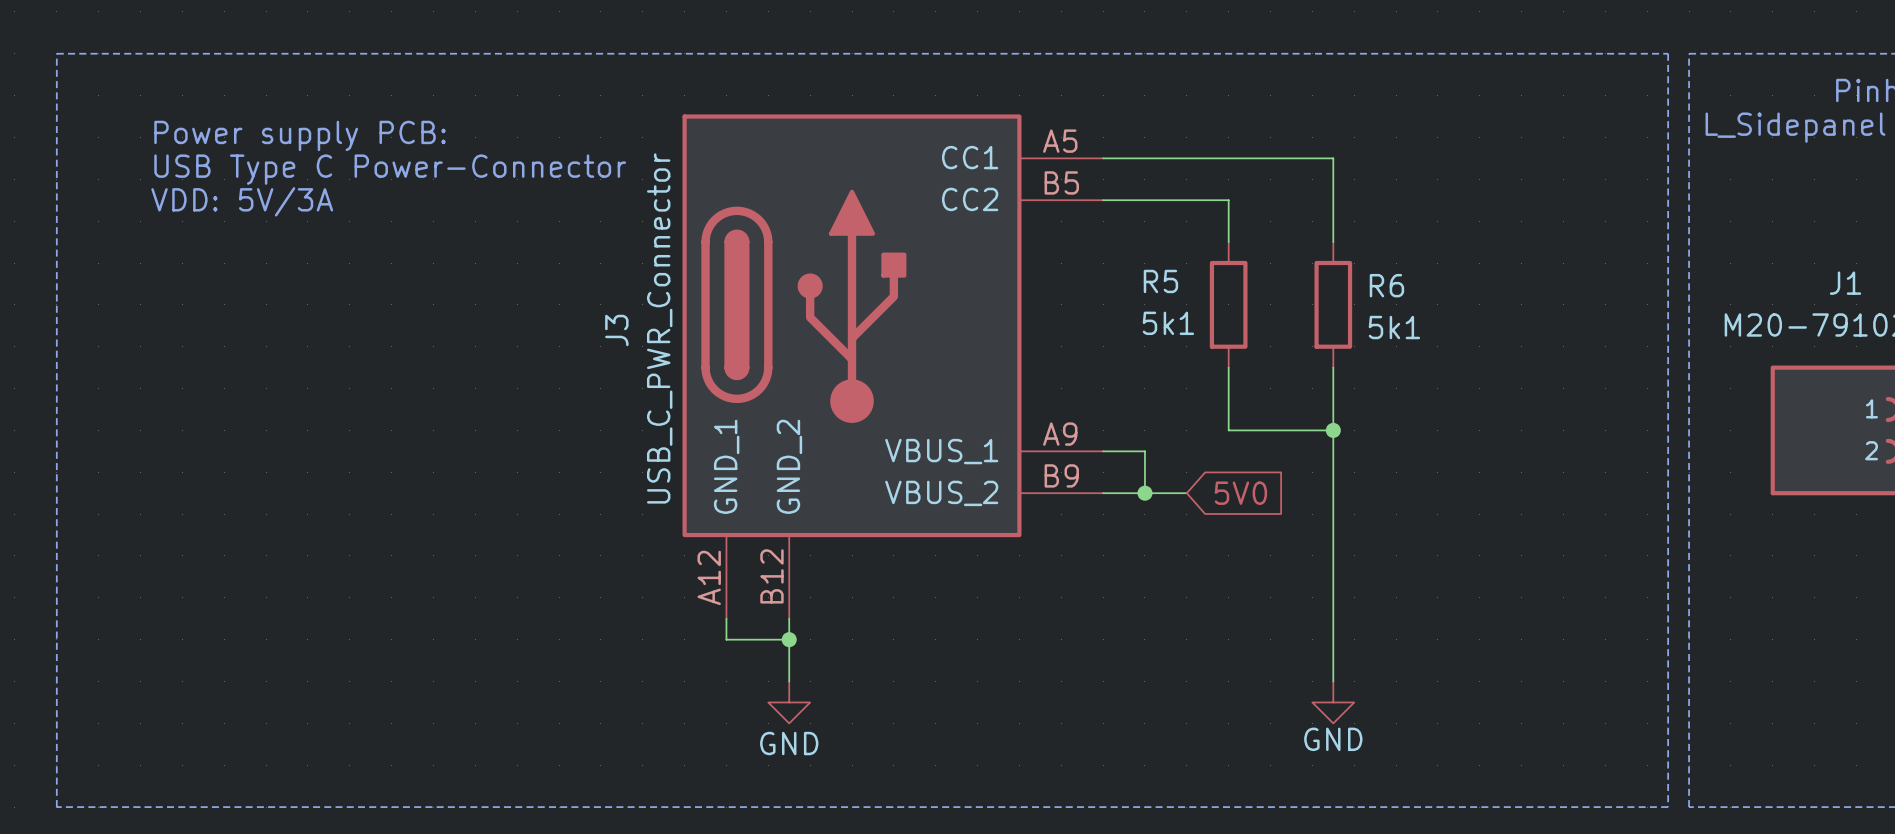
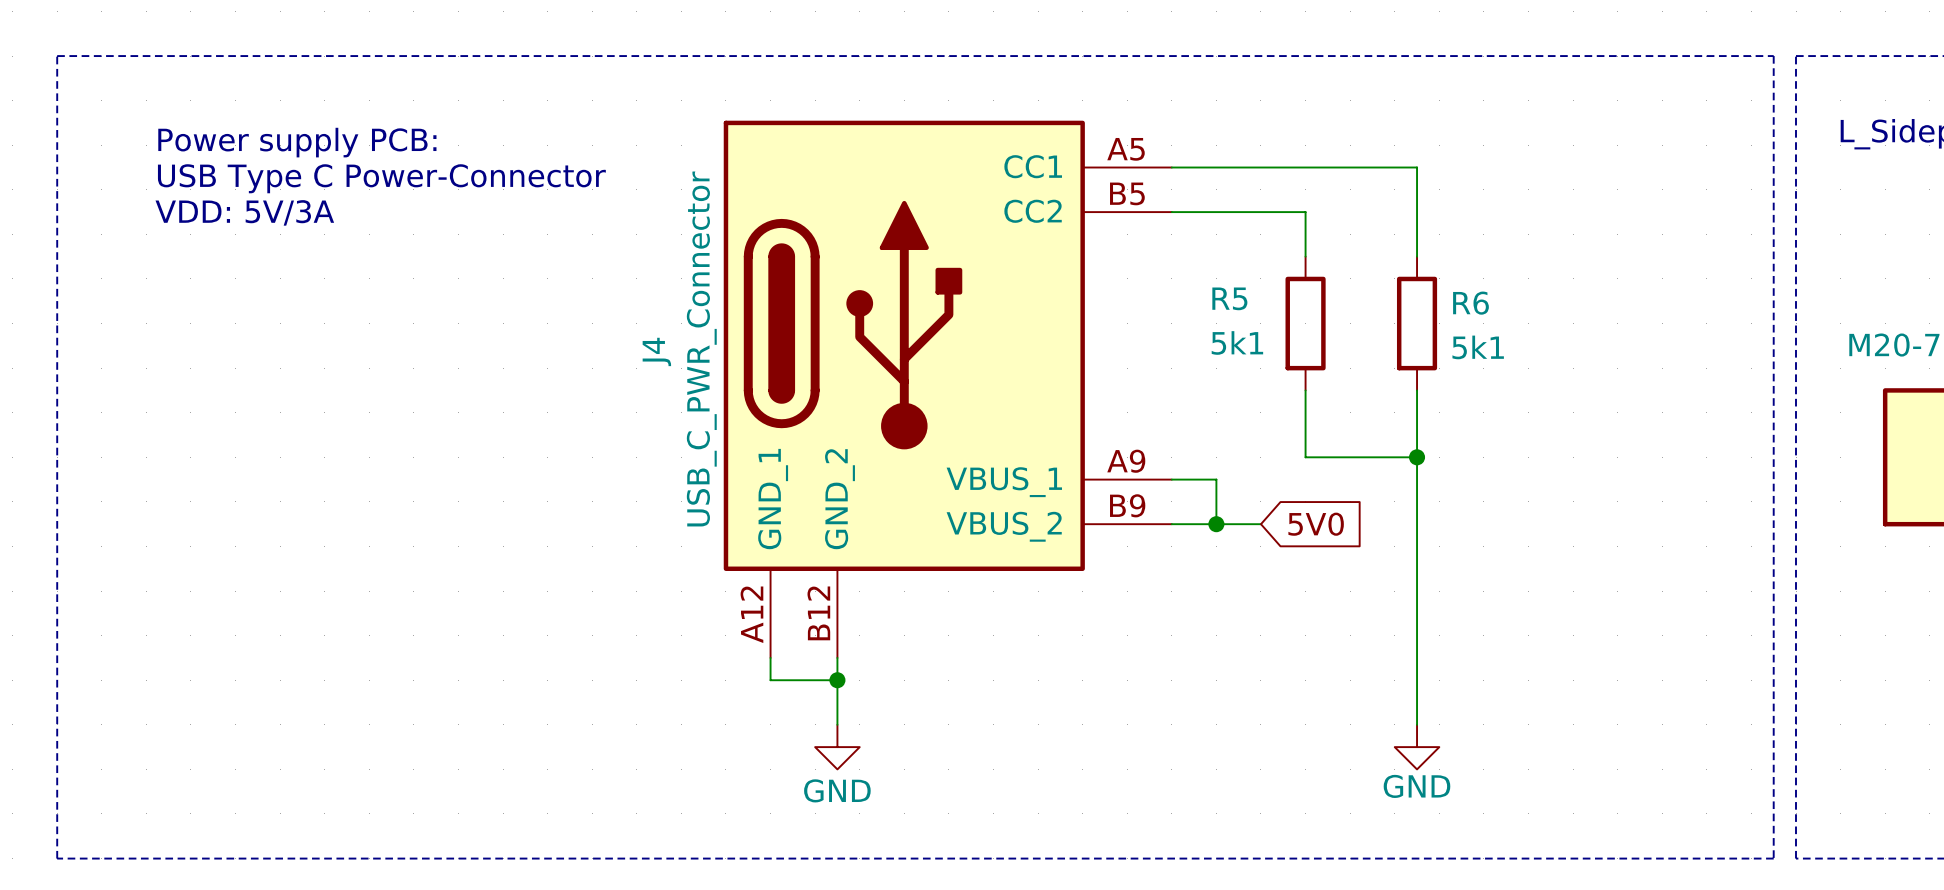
J3 name: J3 (616, 330) -> J4 (656, 351)

